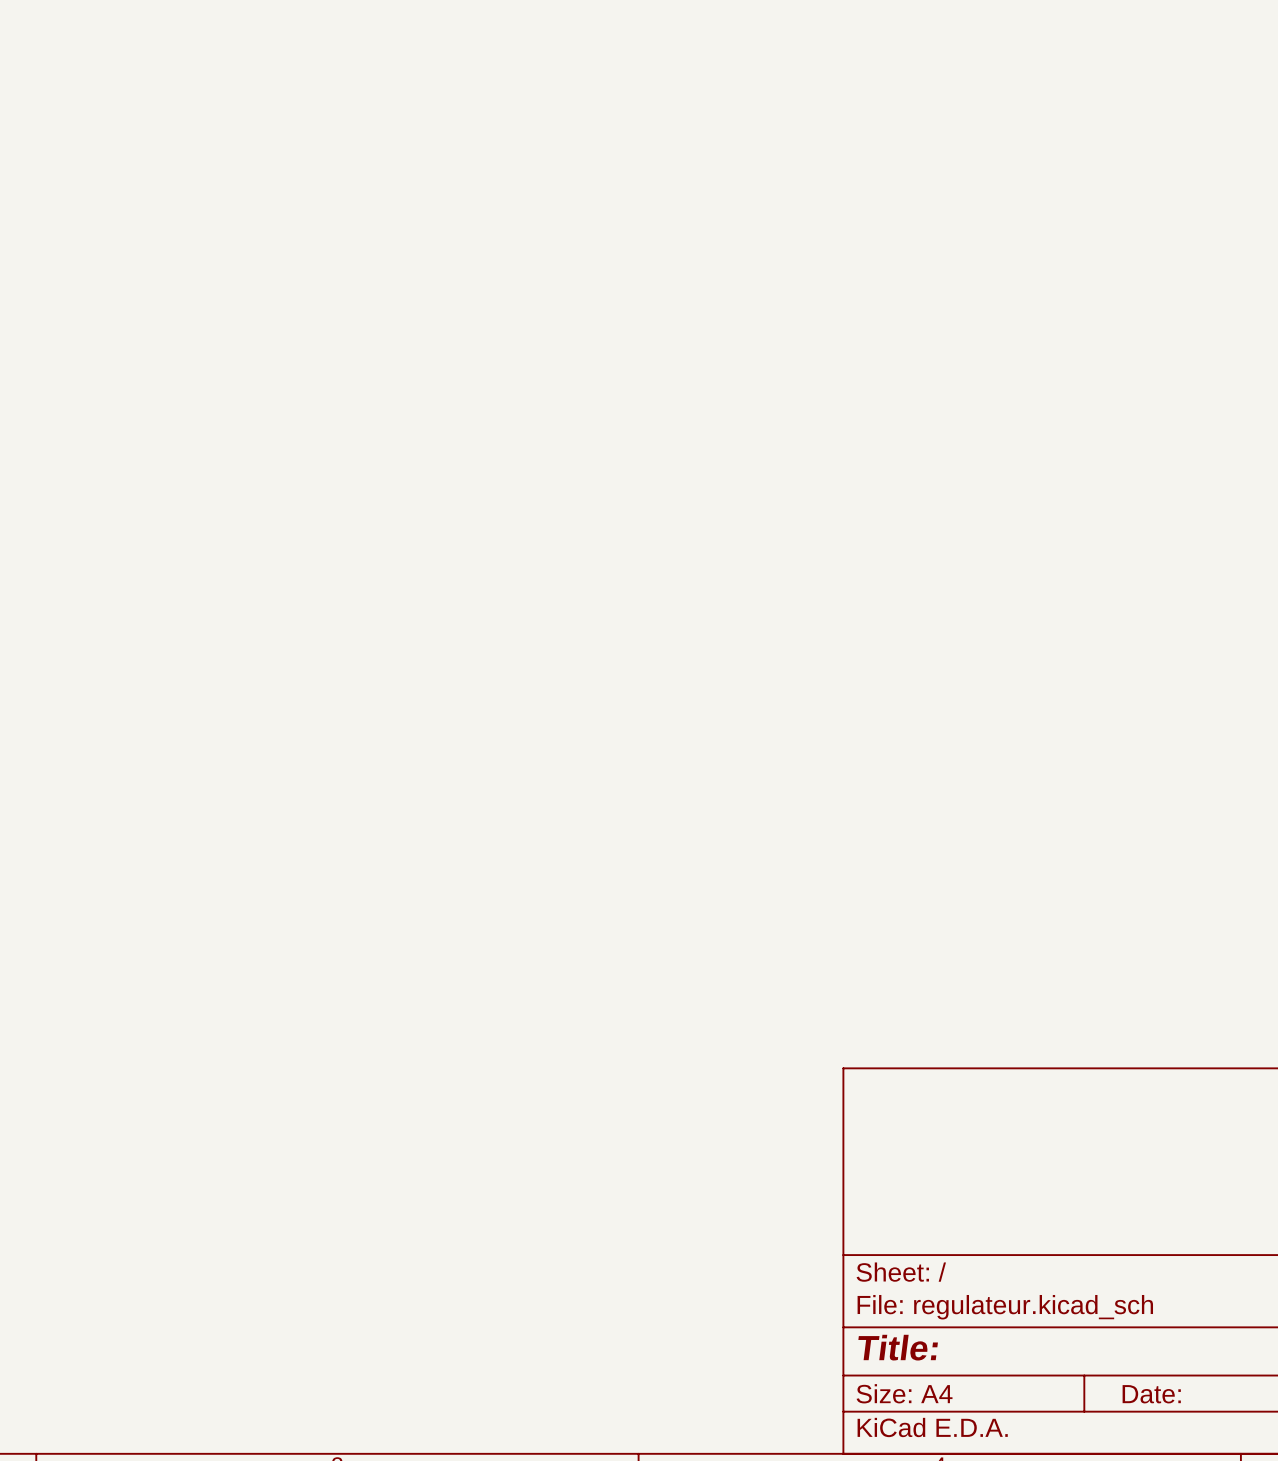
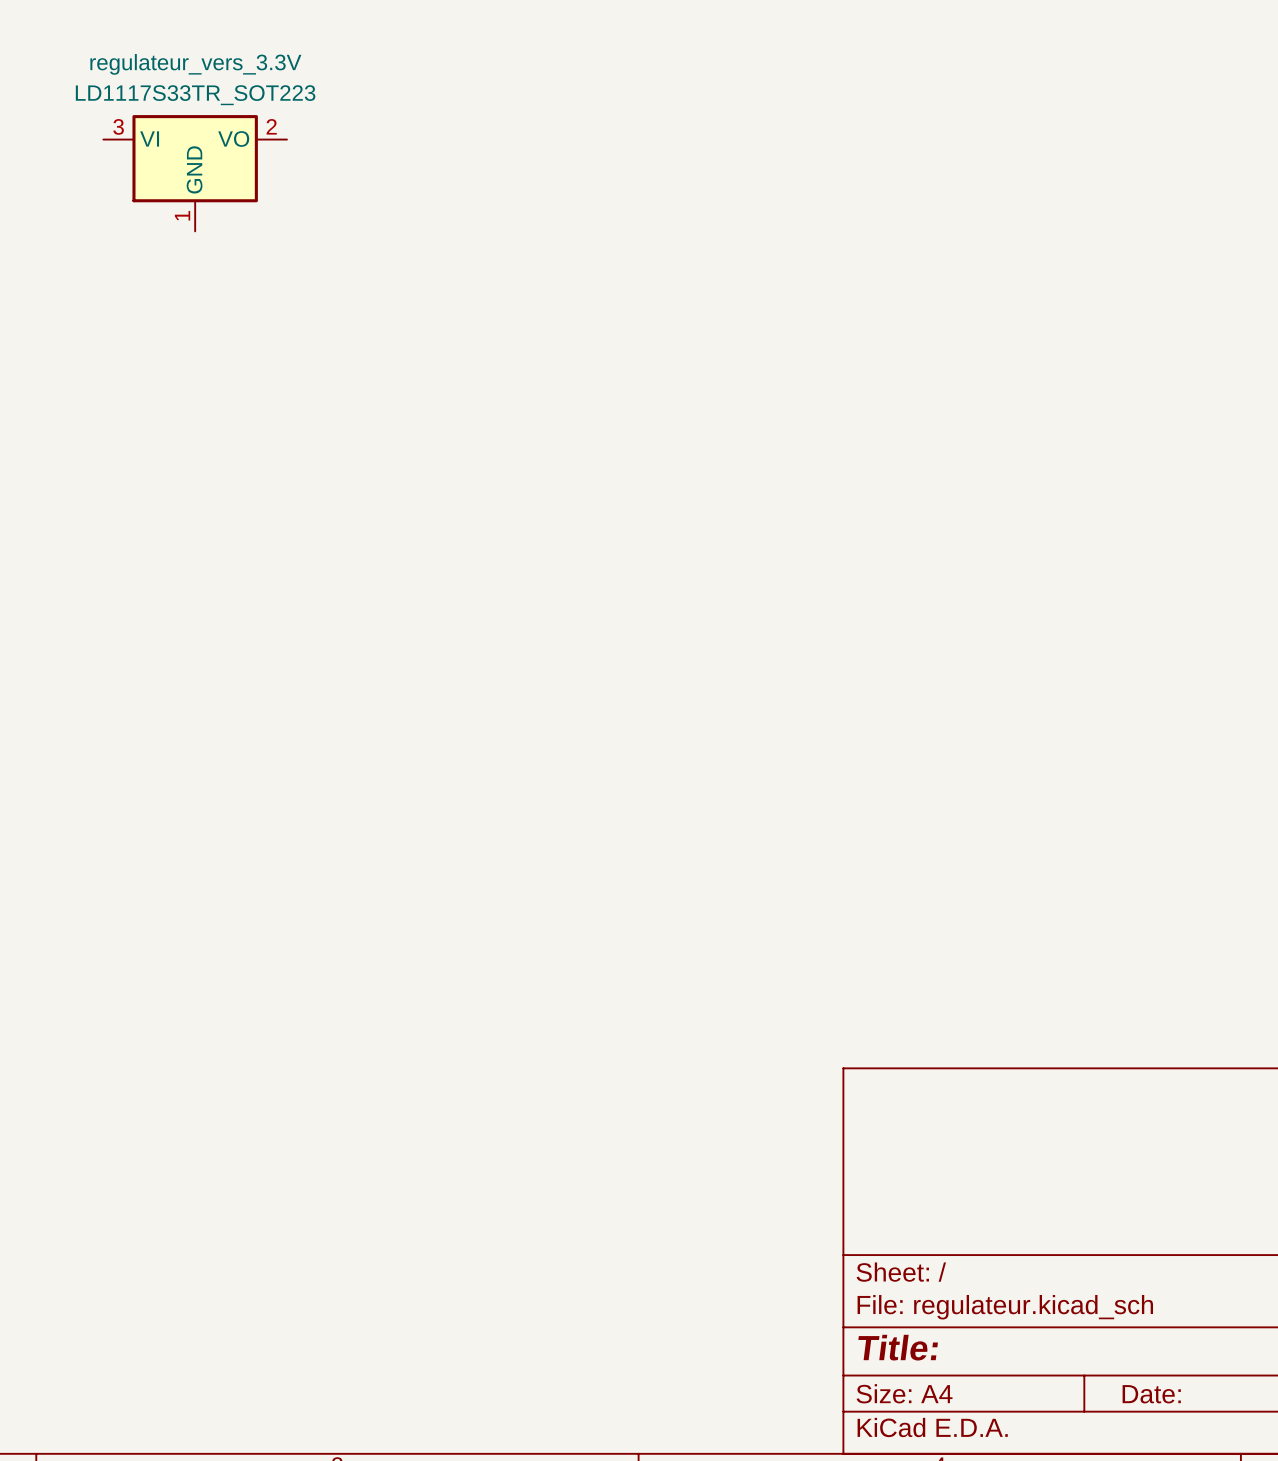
regulateur_vers_3.3V: none -> LD1117S33TR_SOT223 (195, 173)

